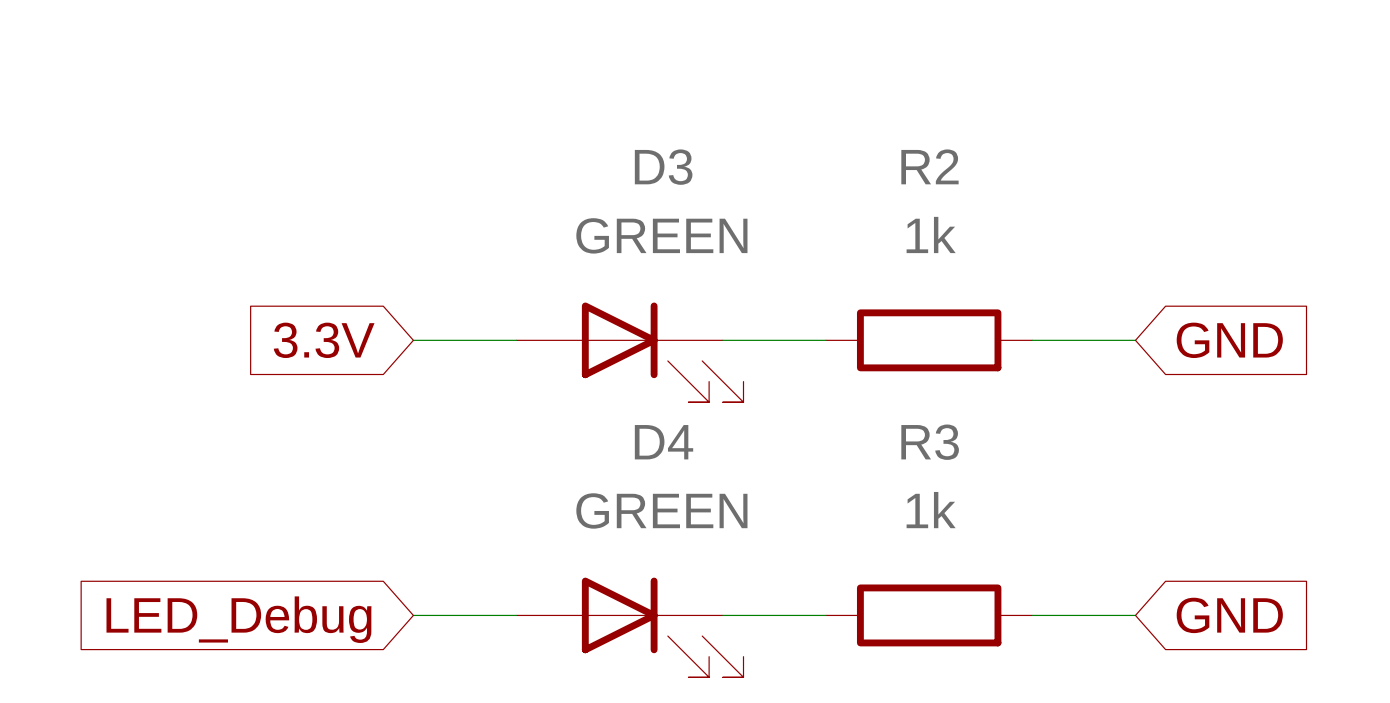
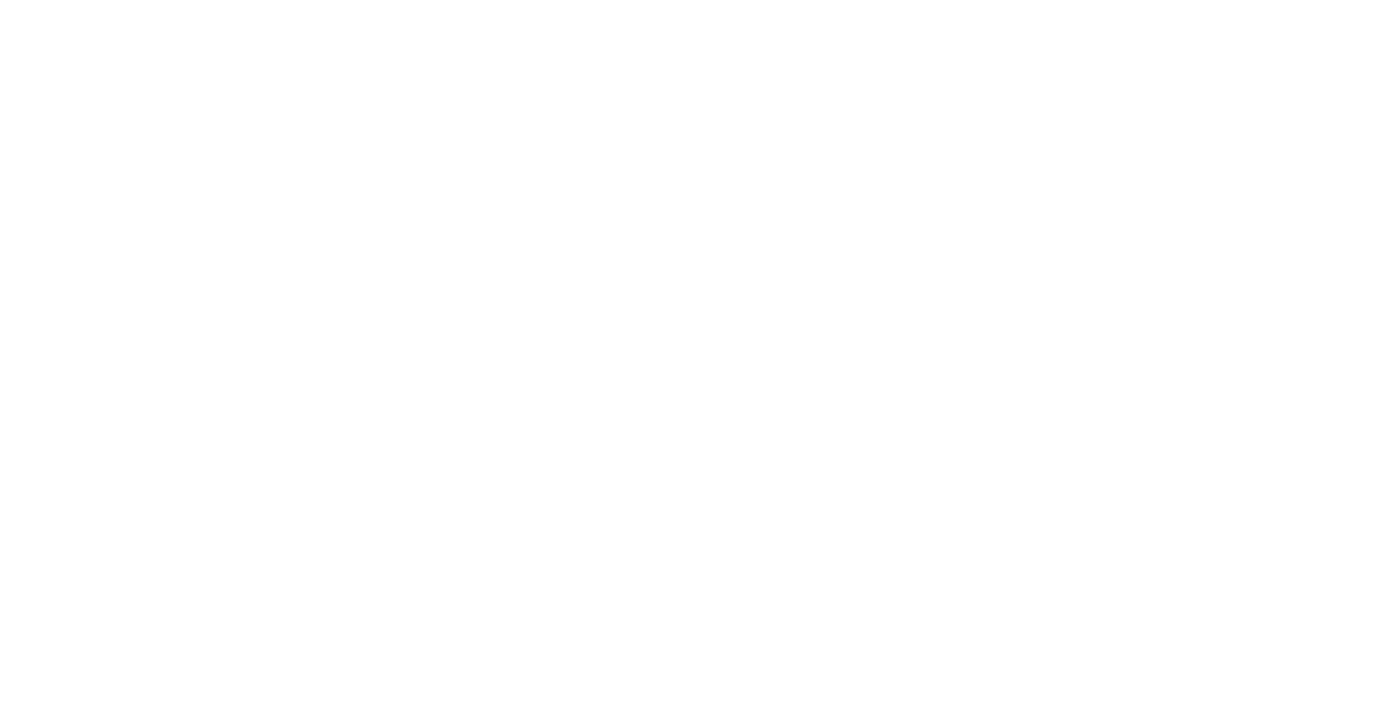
global label: 3.3V (324, 340) -> none
wire: (413, 340) (516, 340) -> none
wire: (722, 340) (826, 340) -> none
R2: 1k (929, 340) -> none
wire: (1032, 340) (1135, 340) -> none
global label: GND (1229, 340) -> none
D3: GREEN (630, 352) -> none
wire: (413, 615) (516, 615) -> none
wire: (722, 615) (826, 615) -> none
R3: 1k (929, 615) -> none
wire: (1032, 615) (1135, 615) -> none
global label: GND (1229, 615) -> none
global label: LED_Debug (238, 619) -> none
D4: GREEN (630, 627) -> none

